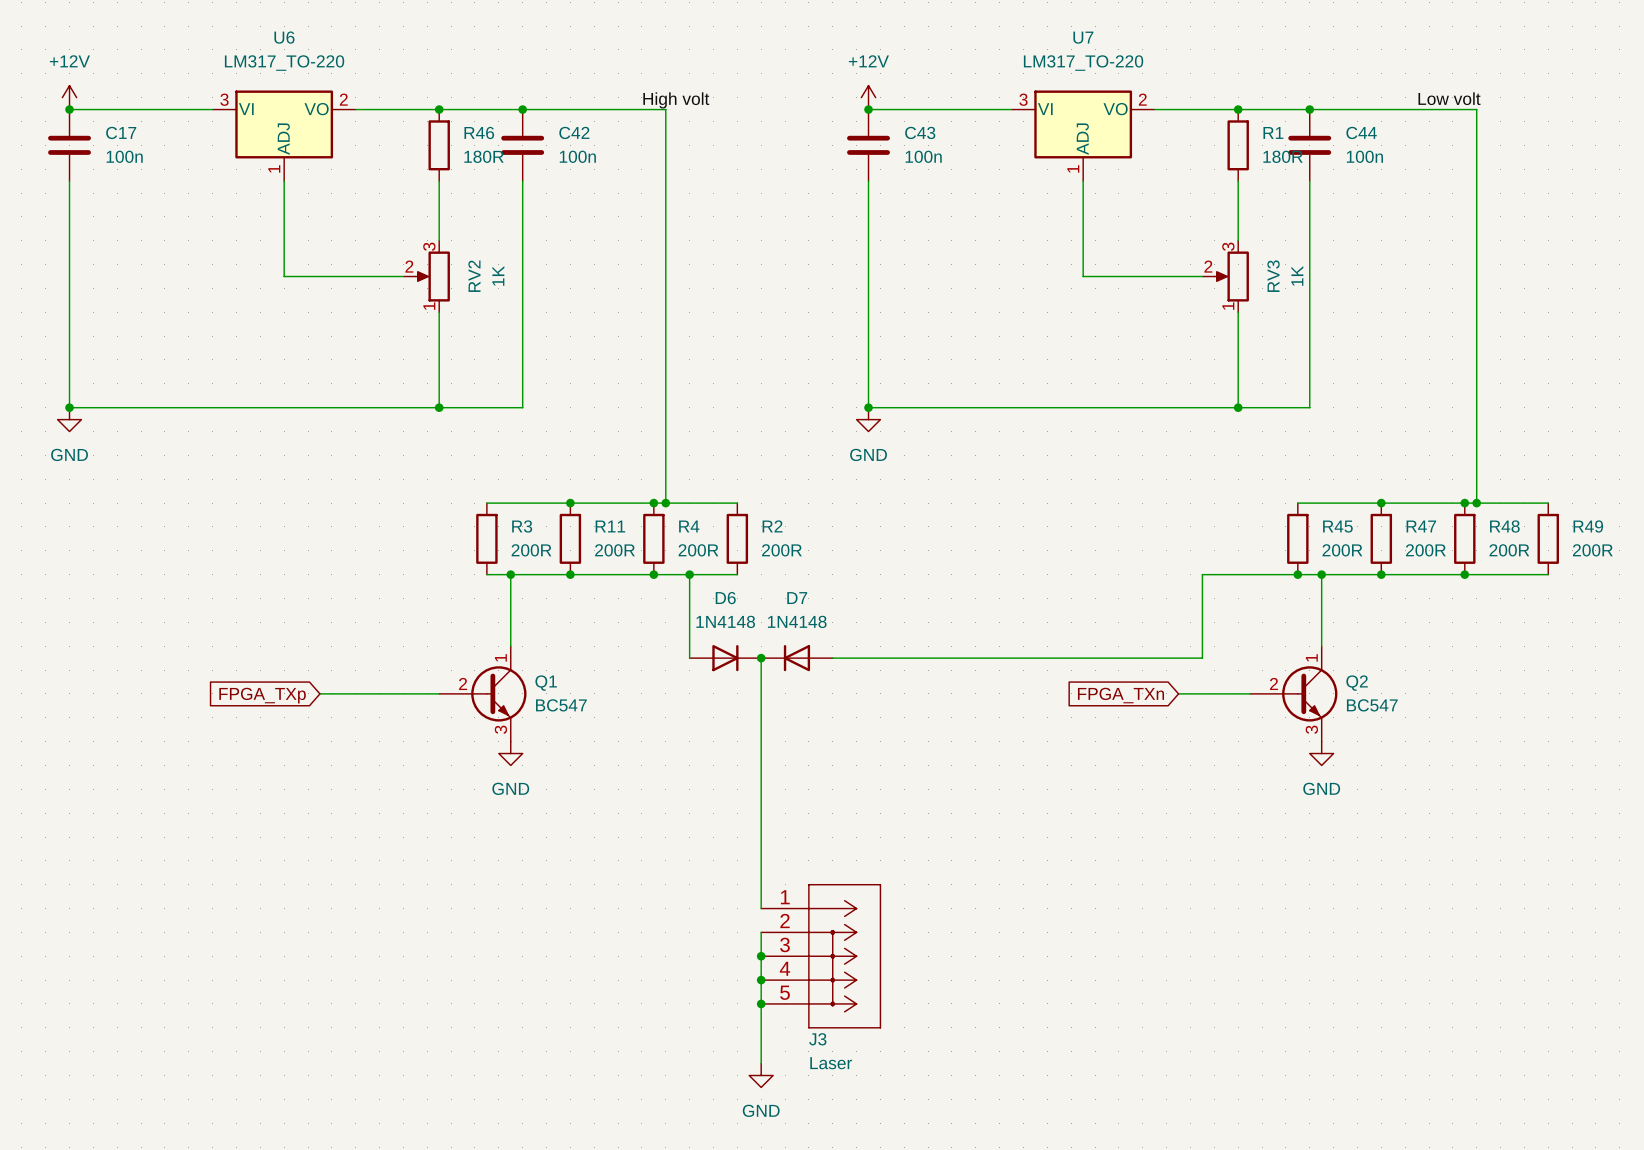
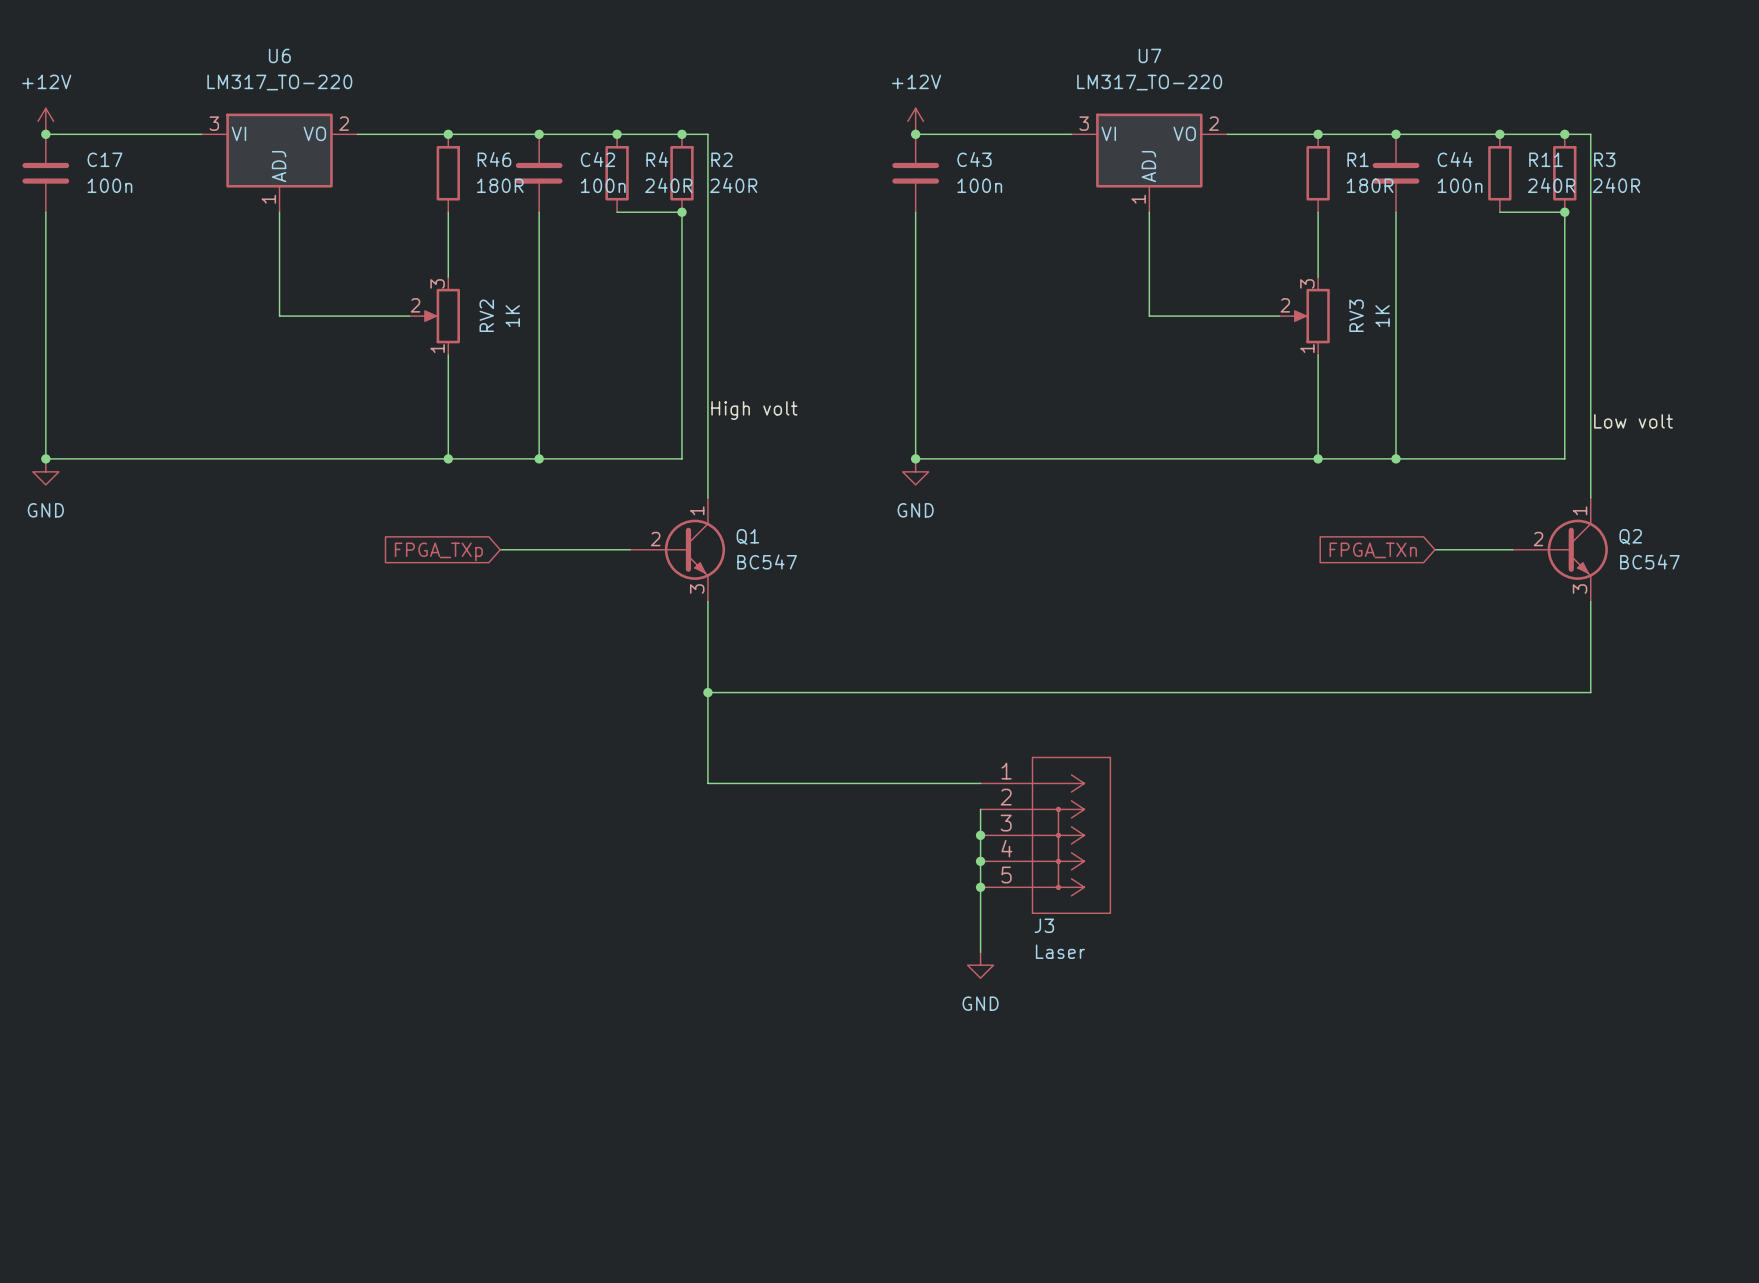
label: Low volt (1449, 98) -> none
label: High volt (676, 100) -> none
junction: none -> (617, 134)
junction: none -> (681, 134)
wire: (665, 109) (665, 503) -> (694, 134) (707, 134) (707, 497)
junction: none -> (1499, 134)
junction: none -> (1564, 134)
wire: (1476, 109) (1476, 503) -> (1577, 134) (1590, 134) (1590, 497)
wire: none -> (617, 212) (681, 212) (681, 458) (539, 458)
junction: none -> (681, 212)
wire: none -> (1499, 212) (1564, 212) (1564, 458) (1396, 458)
junction: none -> (1564, 212)
label: none -> High volt (754, 410)
label: none -> Low volt (1633, 421)
junction: none -> (539, 458)
junction: none -> (1396, 458)
wire: none -> (500, 549) (630, 549)
wire: none -> (1434, 549) (1512, 549)
global label: none -> FPGA_TXp (438, 551)
global label: none -> FPGA_TXn (1373, 550)
wire: (486, 503) (737, 503) -> none
junction: (570, 503) -> none
junction: (653, 503) -> none
junction: (665, 503) -> none
wire: (1297, 503) (1548, 503) -> none
junction: (1381, 503) -> none
junction: (1464, 503) -> none
junction: (1476, 503) -> none
R3 position: (486, 538) -> (1564, 173)
R11 position: (570, 538) -> (1499, 173)
R4 position: (653, 538) -> (617, 173)
wire: none -> (707, 601) (707, 783) (980, 783)
R2 position: (737, 538) -> (681, 173)
R45: 200R (1297, 538) -> none
R47: 200R (1381, 538) -> none
R48: 200R (1464, 538) -> none
wire: none -> (1590, 601) (1590, 692) (707, 692)
R49: 200R (1548, 538) -> none
R3 value: 200R (531, 550) -> 240R (1616, 185)
R11 value: 200R (614, 550) -> 240R (1551, 185)
R4 value: 200R (698, 550) -> 240R (668, 185)
R2 value: 200R (781, 550) -> 240R (733, 185)
wire: (486, 574) (737, 574) -> none
wire: (510, 574) (510, 646) -> none
junction: (510, 574) -> none
junction: (570, 574) -> none
junction: (653, 574) -> none
wire: (689, 574) (689, 658) -> none
junction: (689, 574) -> none
junction: (1297, 574) -> none
wire: (1321, 574) (1321, 646) -> none
junction: (1321, 574) -> none
junction: (1381, 574) -> none
junction: (1464, 574) -> none
wire: (1548, 574) (1202, 574) (1202, 658) (832, 658) -> none
junction: none -> (707, 692)
D6: 1N4148 (725, 658) -> none
wire: (761, 658) (761, 908) -> none
junction: (761, 658) -> none
D7: 1N4148 (796, 658) -> none
wire: (319, 693) (439, 693) -> none
Q1 position: (482, 693) -> (677, 549)
wire: (1178, 693) (1250, 693) -> none
Q2 position: (1293, 693) -> (1560, 549)
global label: FPGA_TXp (262, 695) -> none
global label: FPGA_TXn (1120, 695) -> none
wire: none -> (980, 809) (980, 952)
power symbol: GND (510, 753) -> none
junction: none -> (980, 835)
power symbol: GND (1321, 753) -> none
junction: none -> (980, 861)
junction: none -> (980, 887)
power symbol: none -> GND (980, 965)
wire: (761, 932) (761, 1063) -> none
junction: (761, 956) -> none
J3 position: (821, 956) -> (1045, 835)
junction: (761, 980) -> none
junction: (761, 1003) -> none
power symbol: GND (761, 1075) -> none

